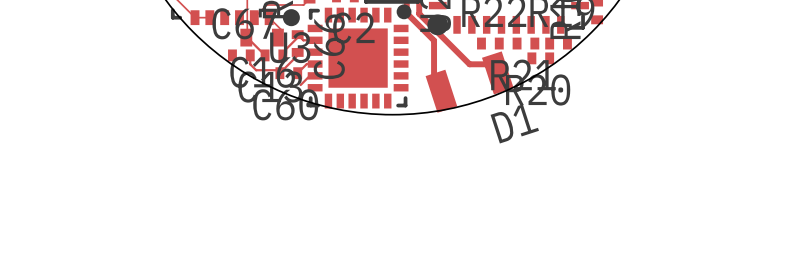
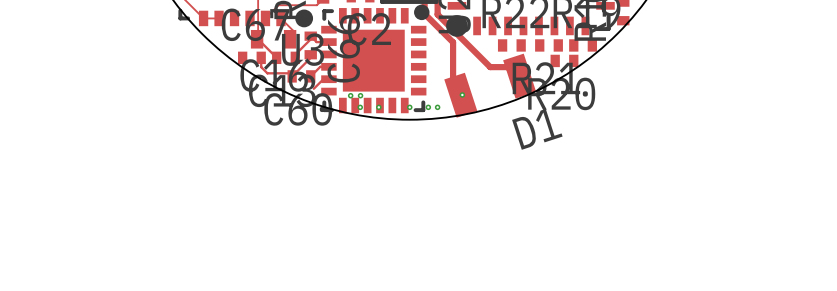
via: none -> (462, 94)
via: none -> (350, 95)
via: none -> (360, 95)
via: none -> (360, 107)
via: none -> (378, 107)
via: none -> (409, 107)
via: none -> (428, 107)
via: none -> (437, 107)

